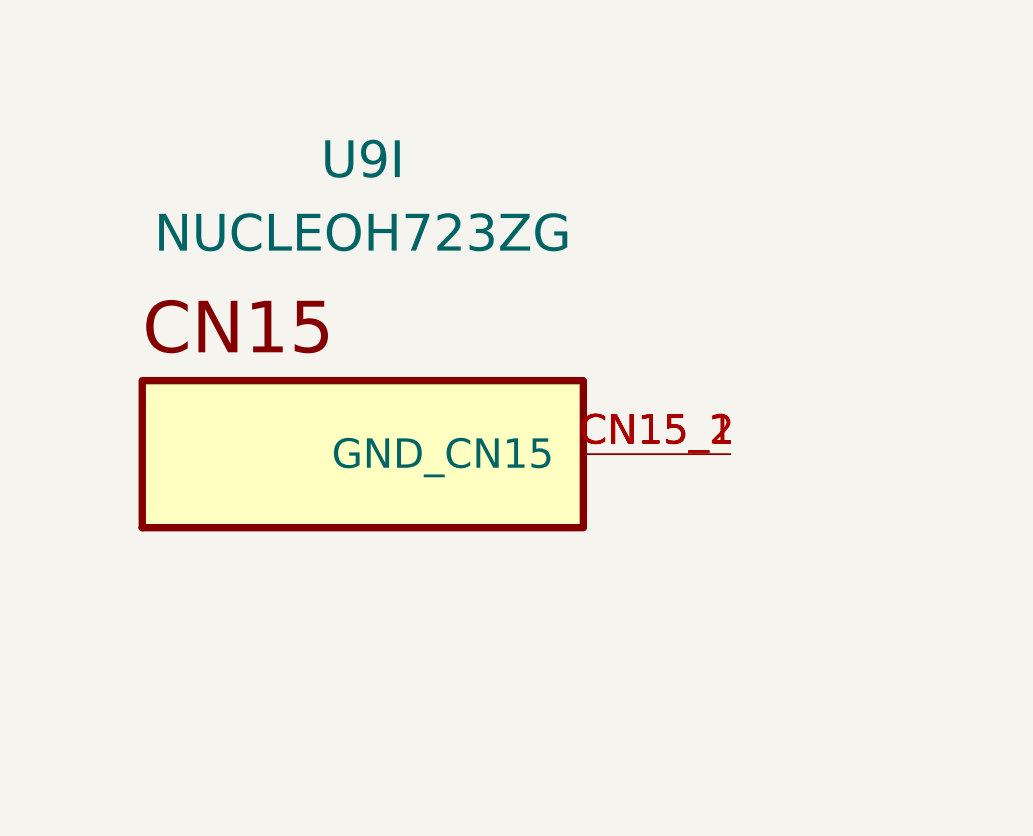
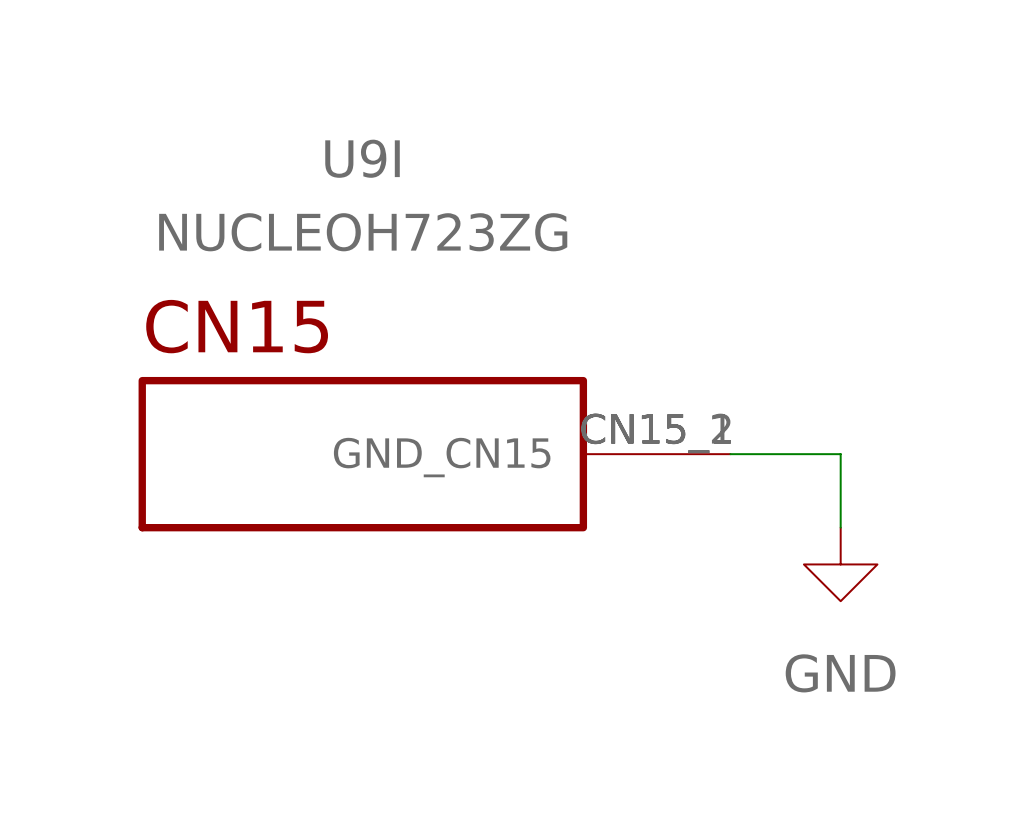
wire: none -> (730, 454) (840, 454) (840, 527)
power symbol: none -> GND (840, 564)

